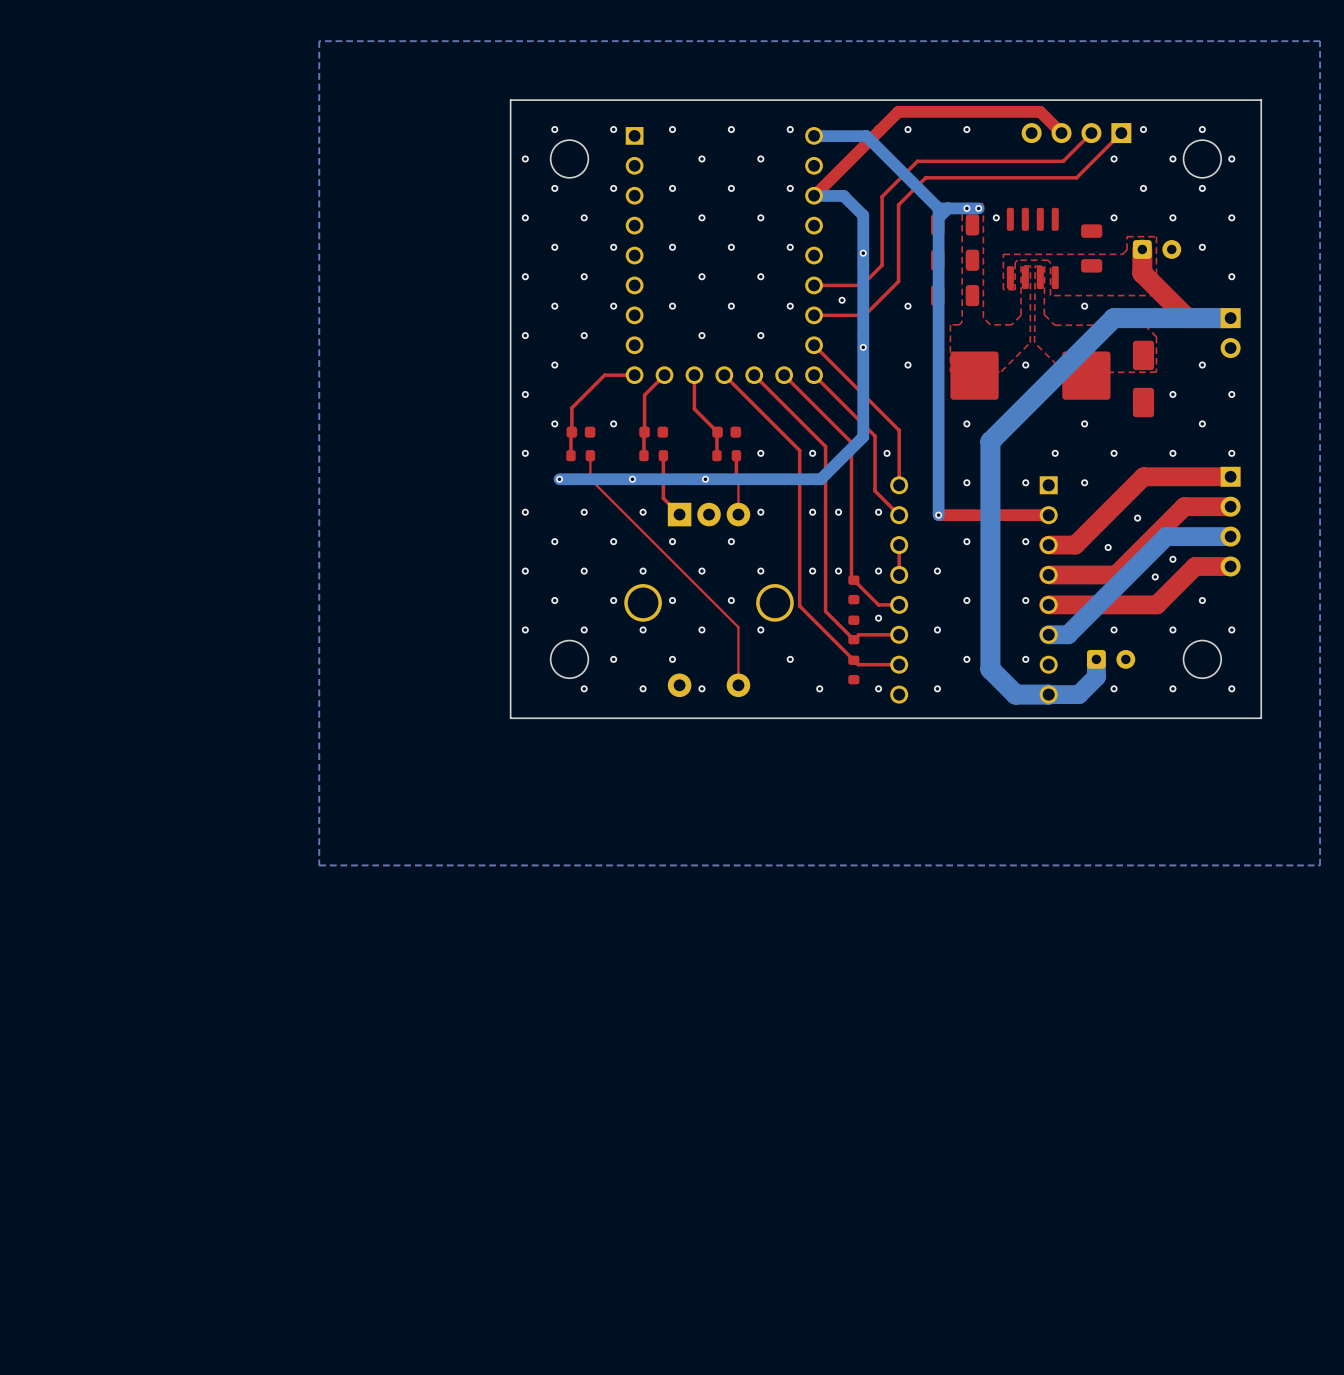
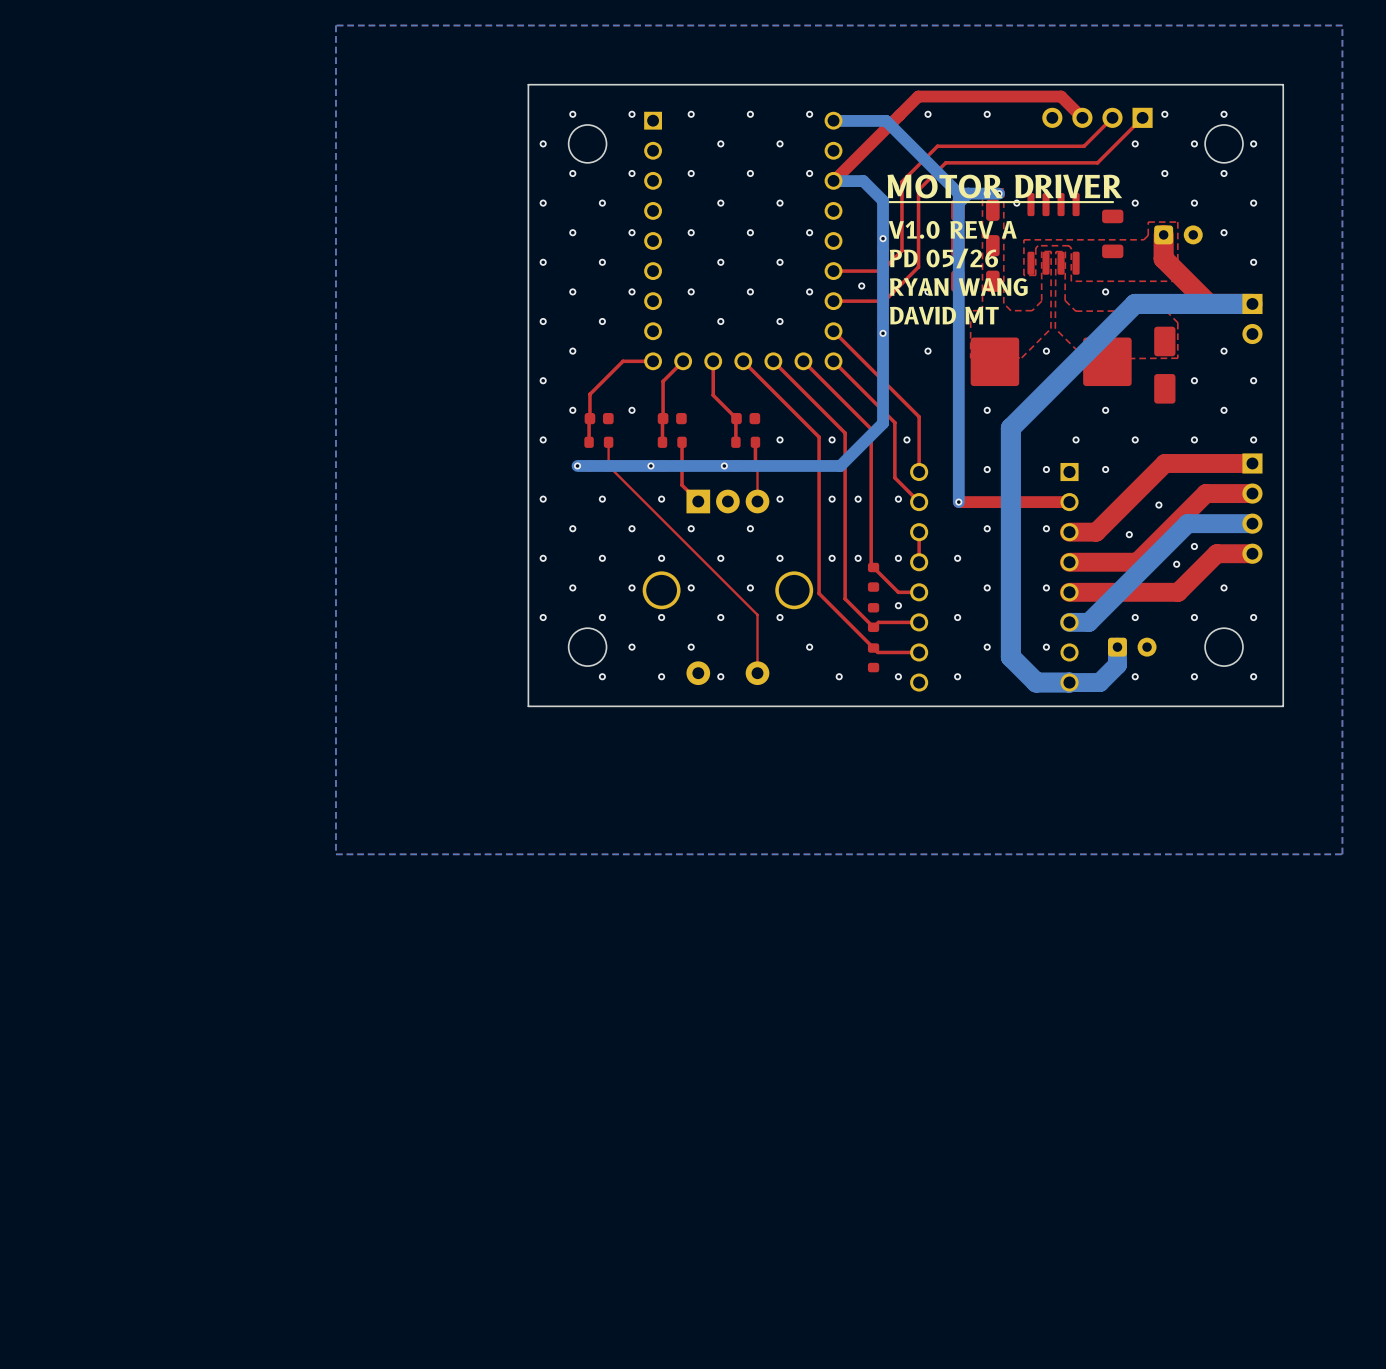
text: none -> MOTOR DRIVER (1004, 186)
drawing: none -> [888, 201, 1114, 204]
text: none -> V1.0 REV A (952, 229)
text: none -> PD 05/26 (943, 258)
text: none -> RYAN WANG (958, 287)
text: none -> DAVID MT (944, 315)

